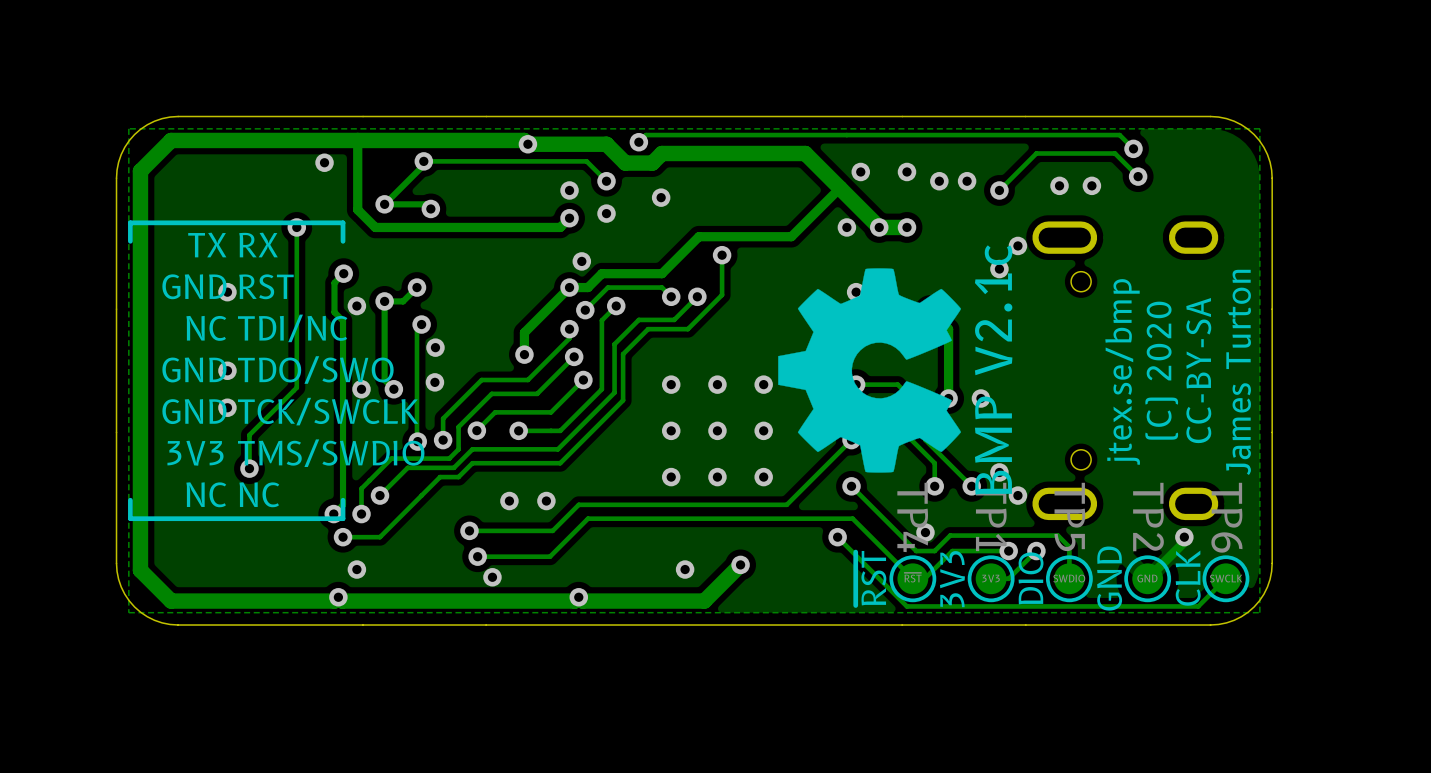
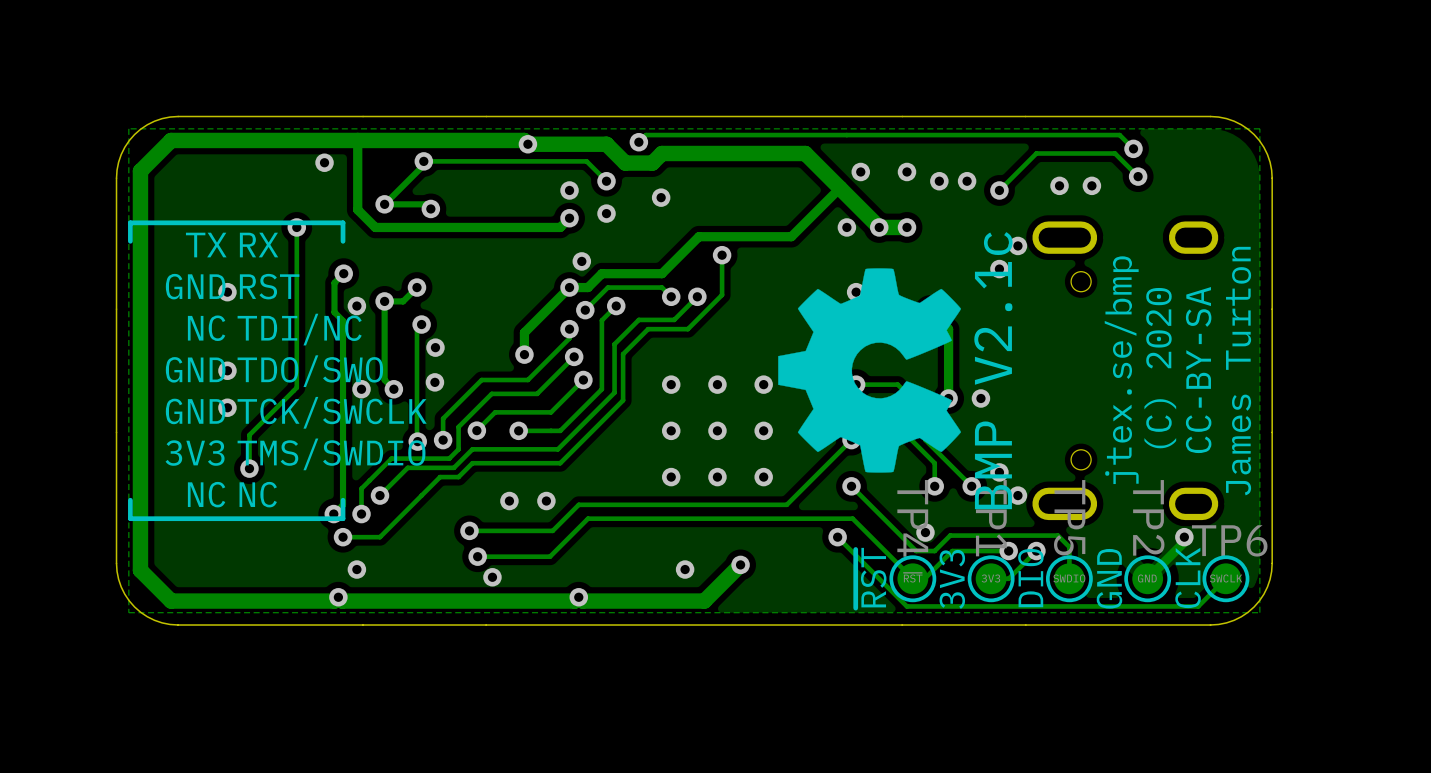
TP6 name rotation: 0° (1226, 517) -> 90° counterclockwise (1229, 540)

